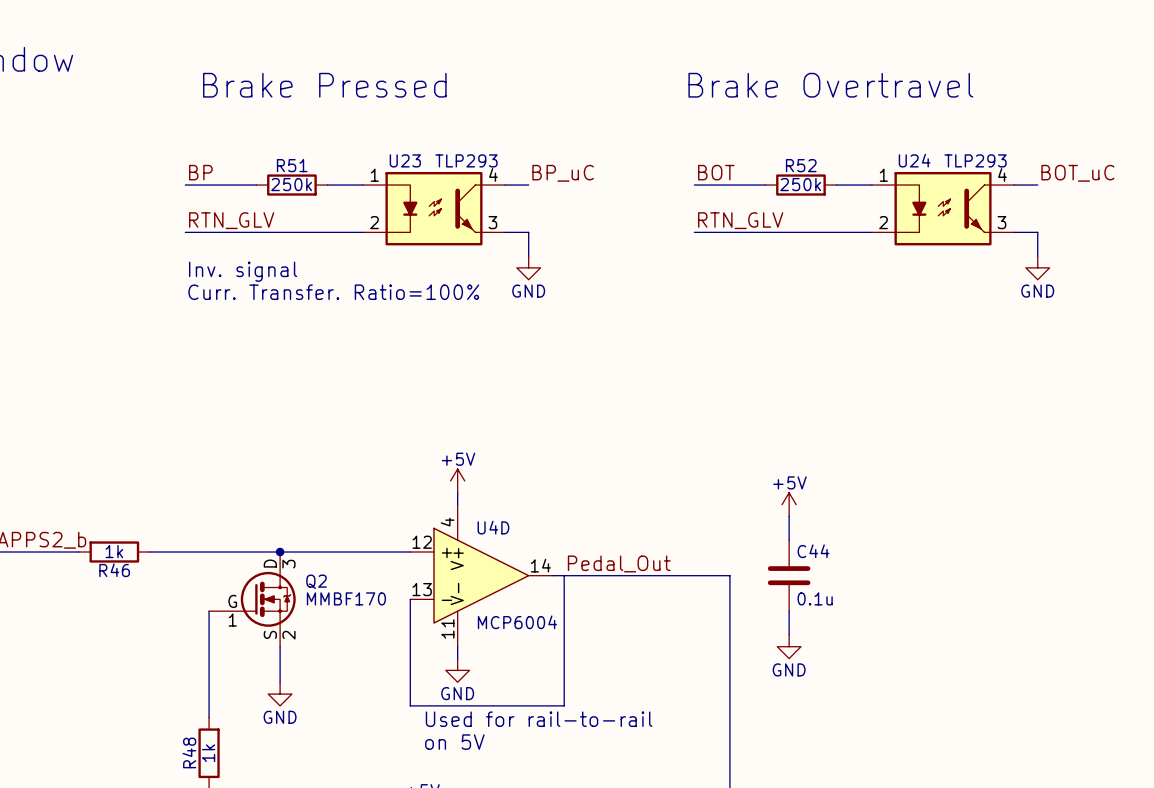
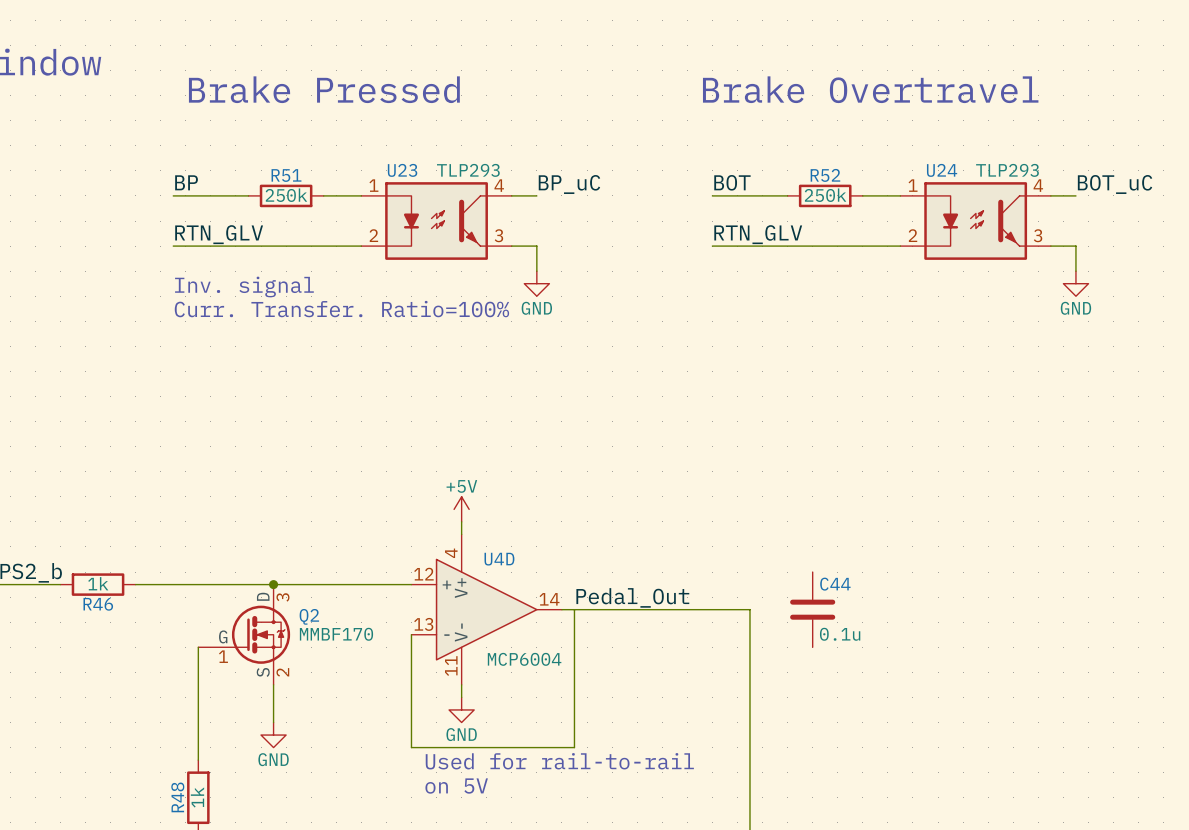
power symbol: +5V (789, 504) -> none
wire: (789, 516) (789, 540) -> none
wire: (789, 611) (789, 634) -> none
power symbol: GND (789, 646) -> none

